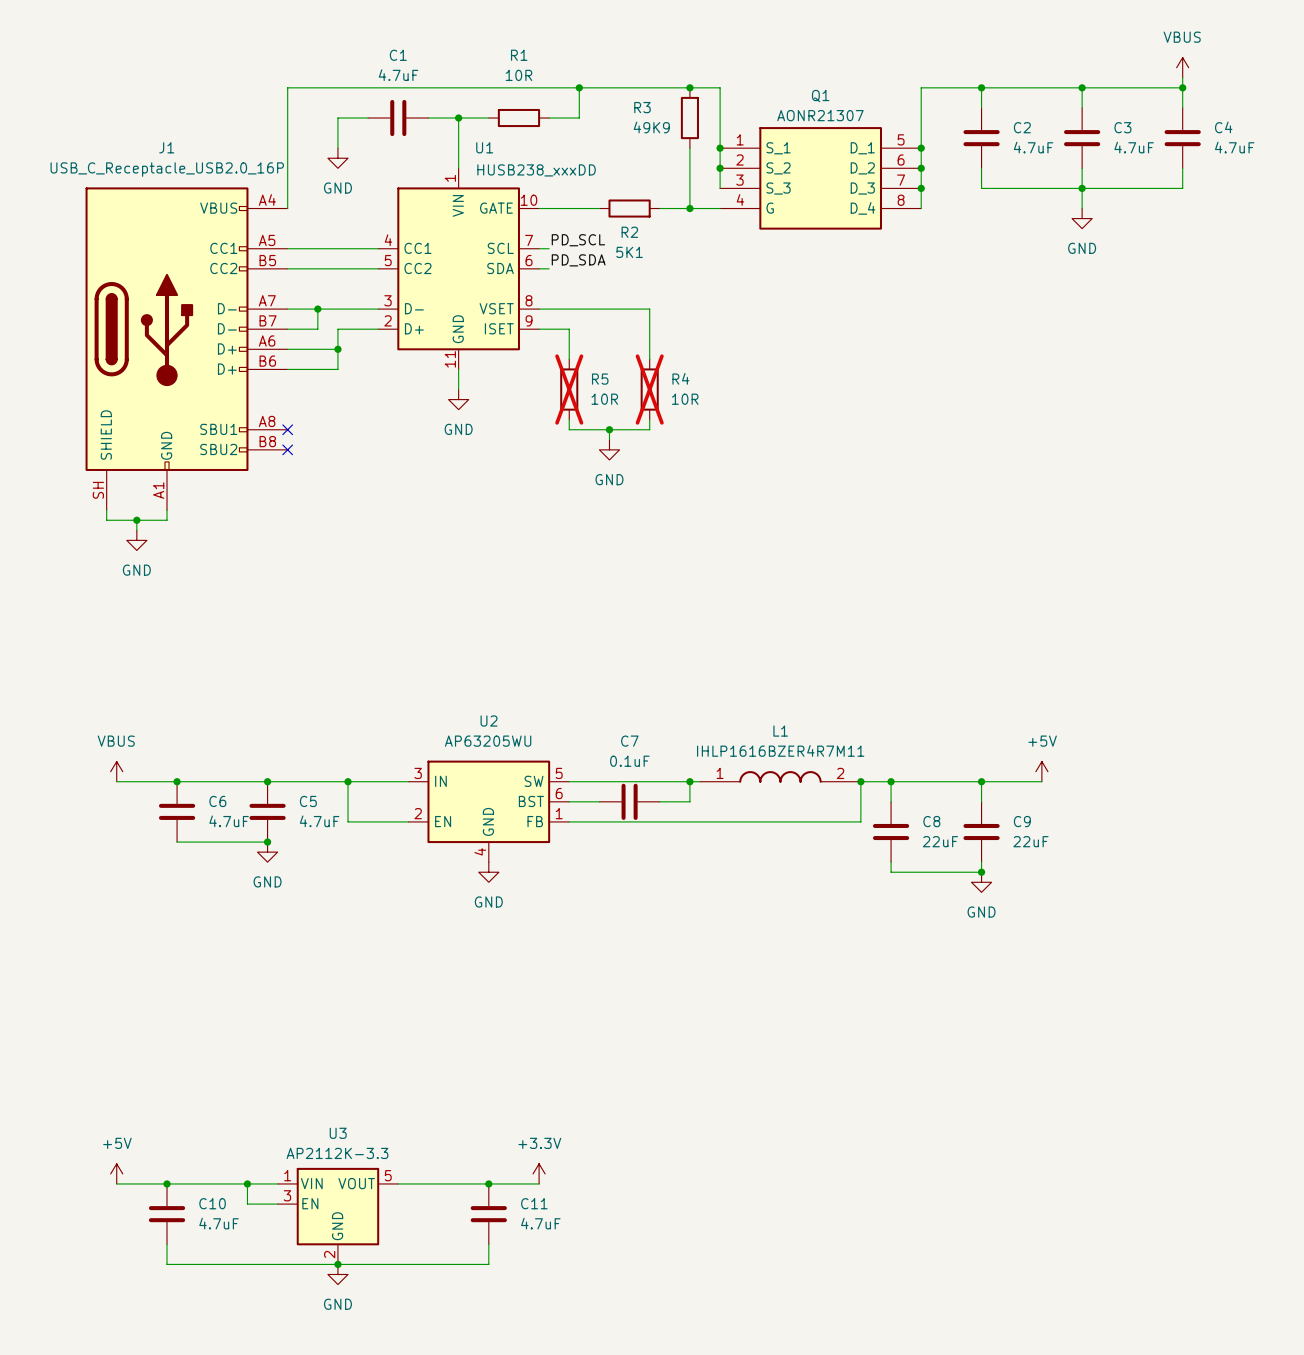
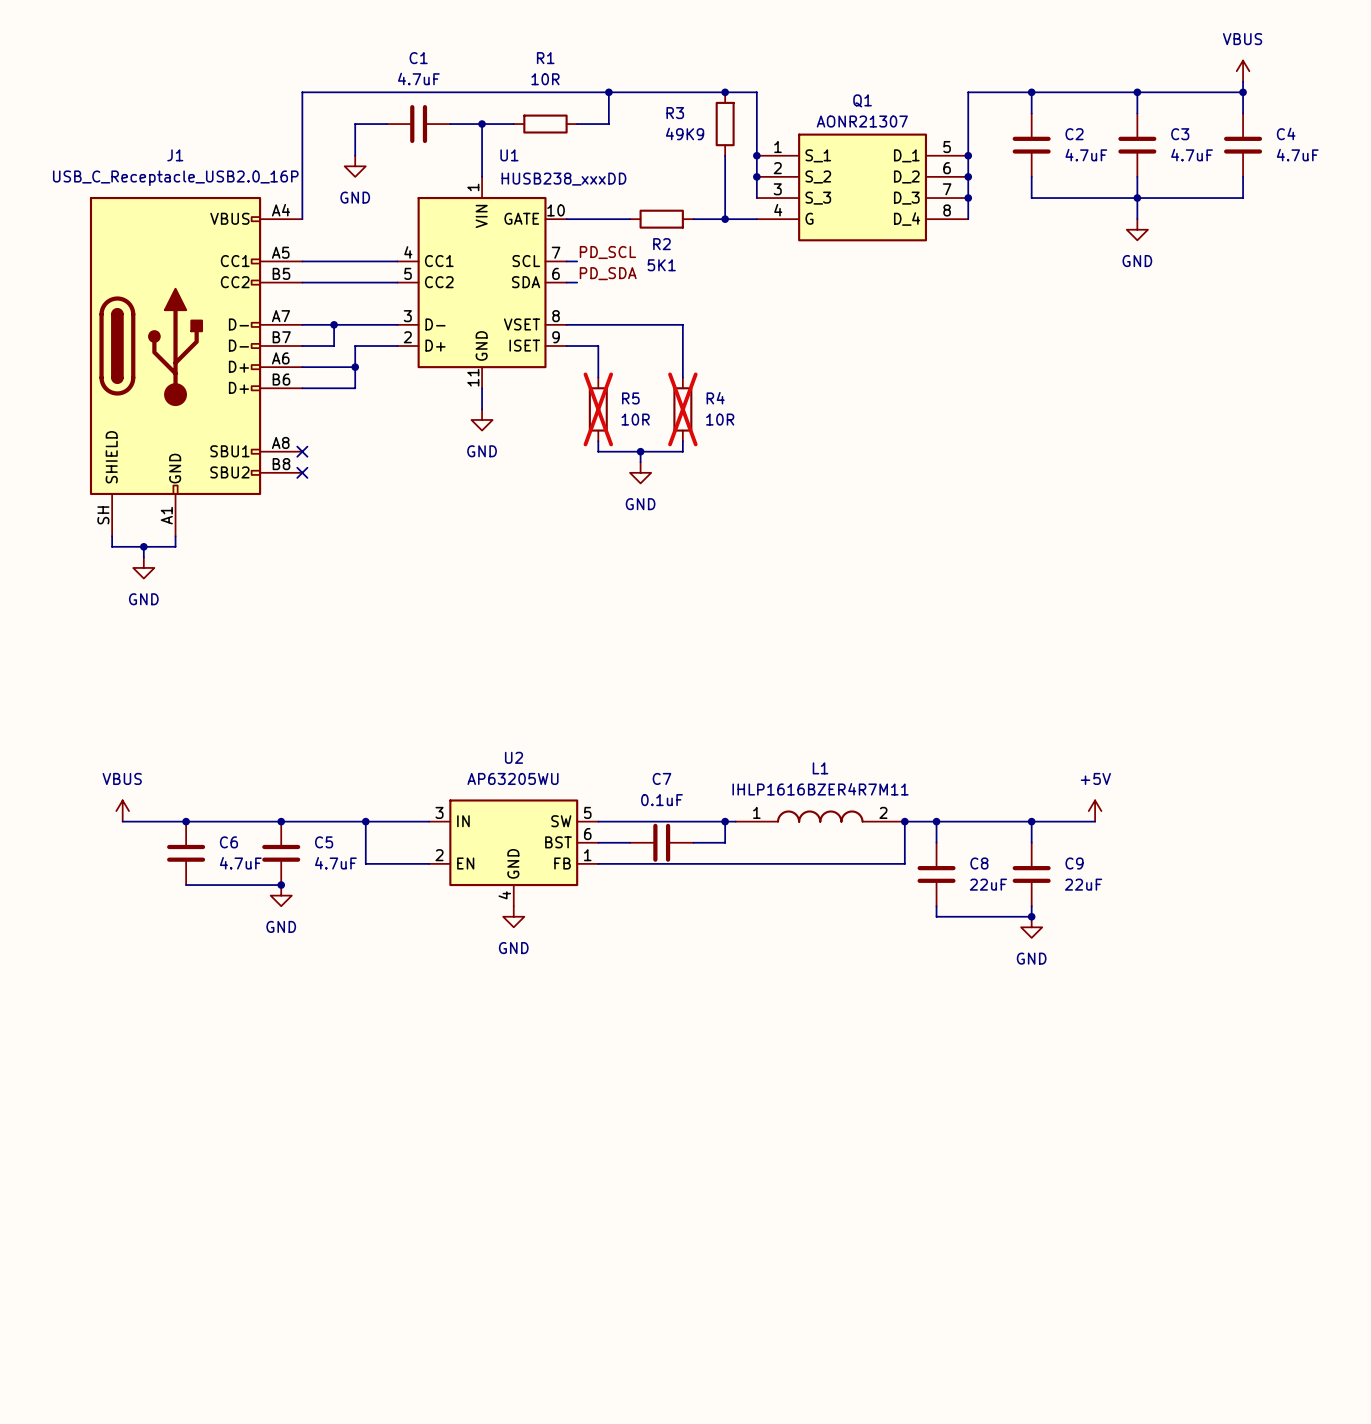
power symbol: +5V (116, 1173) -> none
power symbol: +3.3V (539, 1173) -> none
wire: (116, 1183) (277, 1183) -> none
junction: (167, 1183) -> none
wire: (247, 1183) (247, 1204) (277, 1204) -> none
junction: (247, 1183) -> none
wire: (398, 1183) (539, 1183) -> none
junction: (488, 1183) -> none
C10: 4.7uF (167, 1214) -> none
C11: 4.7uF (488, 1214) -> none
U3: AP2112K-3.3 (337, 1216) -> none
wire: (167, 1244) (167, 1264) (488, 1264) (488, 1244) -> none
junction: (337, 1264) -> none
power symbol: GND (337, 1274) -> none

